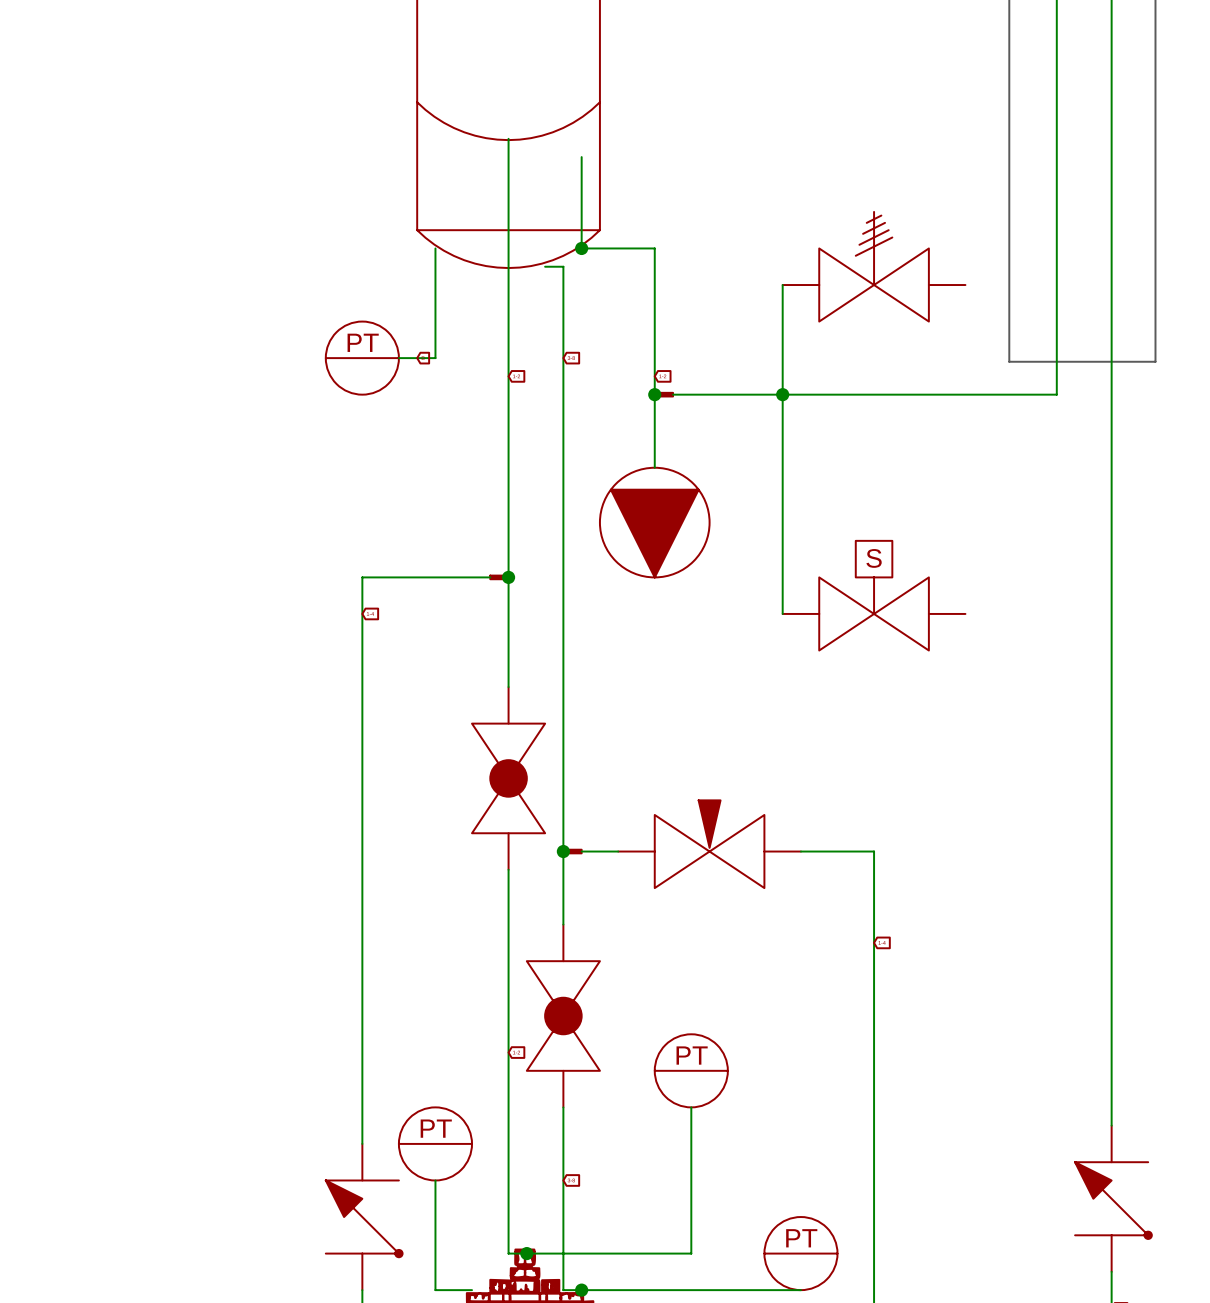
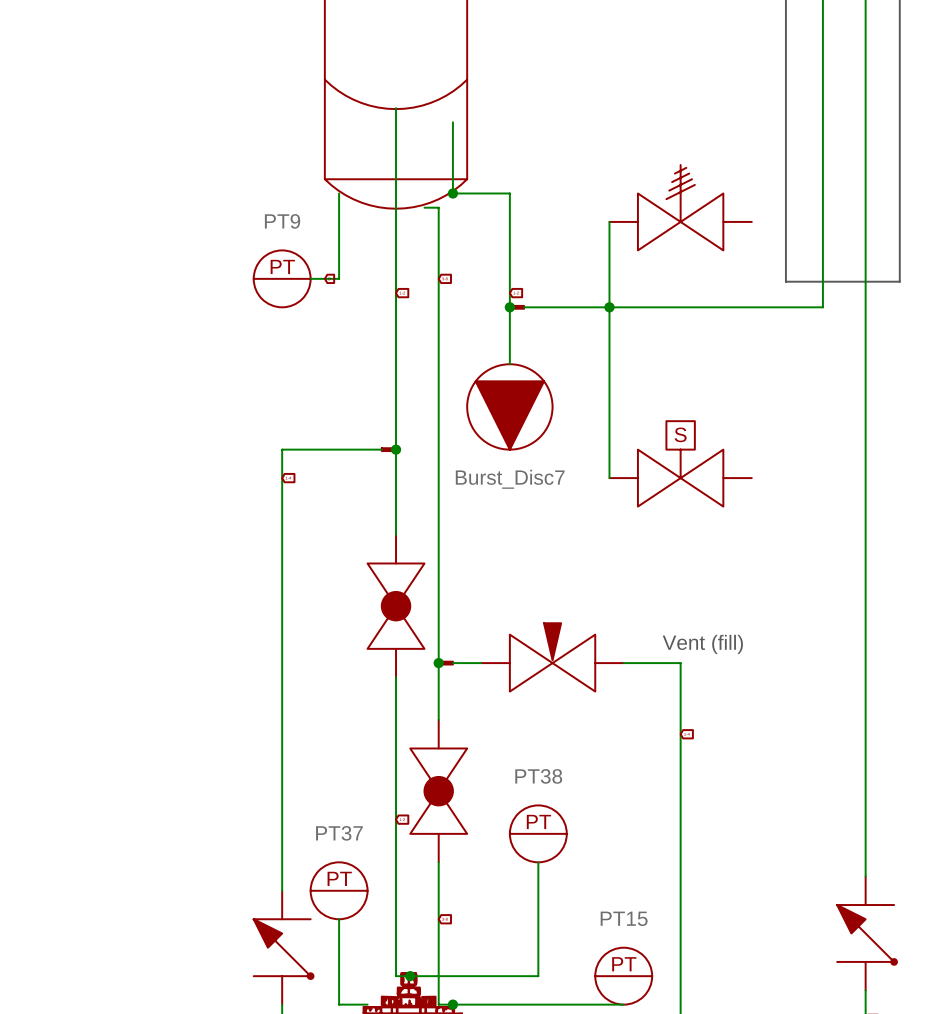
PT9 name: none -> PT9 (282, 221)
Burst_Disc7 name: none -> Burst_Disc7 (510, 479)
text: none -> Vent (fill) (702, 644)
PT38 name: none -> PT38 (538, 776)
PT37 name: none -> PT37 (339, 833)
PT15 name: none -> PT15 (624, 918)

